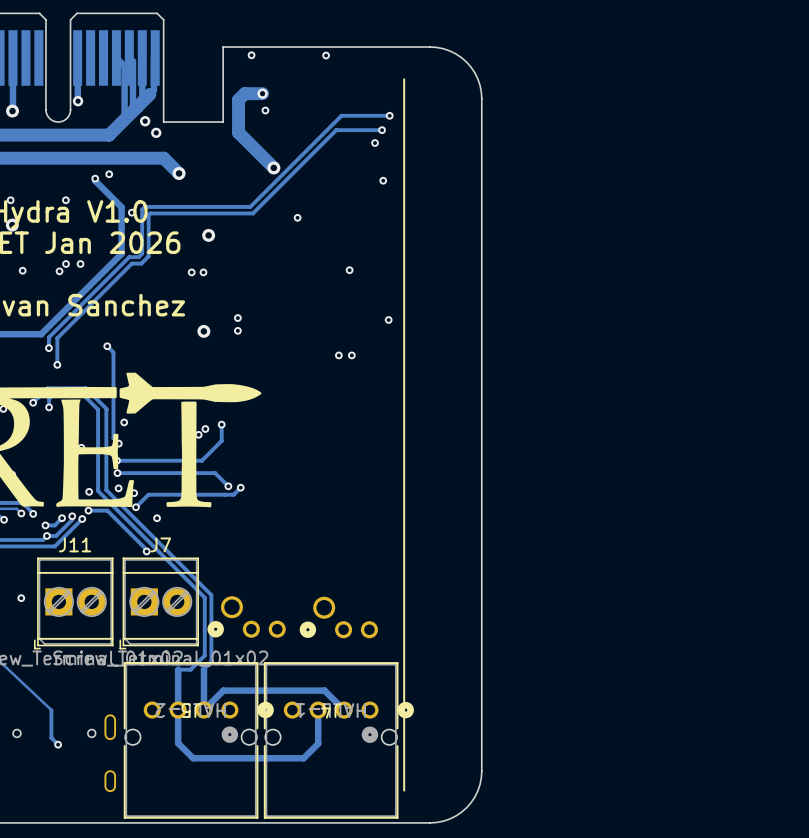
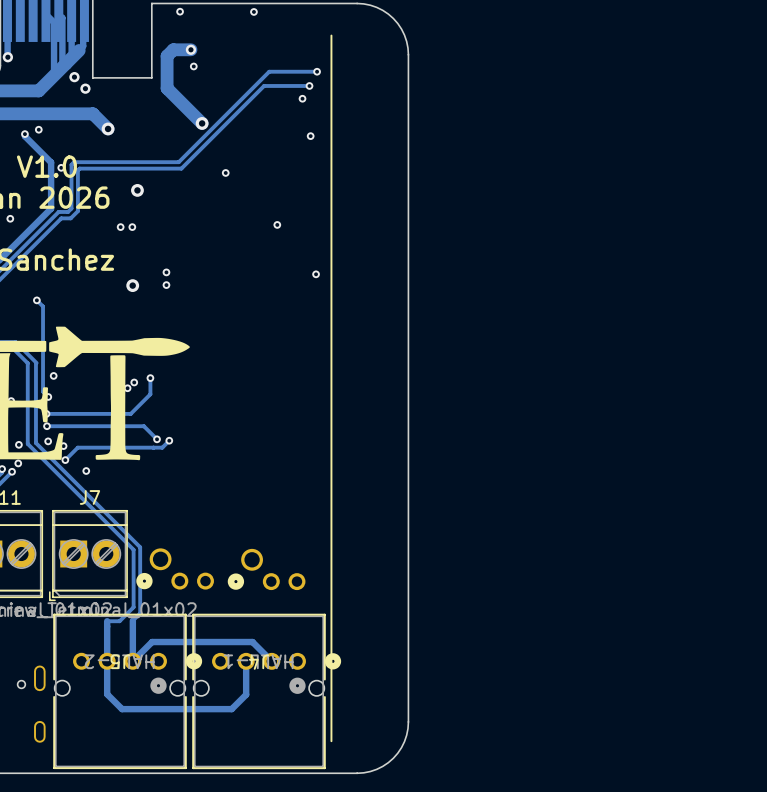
via: (338, 355) -> none
via: (351, 355) -> none
track: (88, 510) (107, 510) (146, 551) -> none
via: (146, 551) -> none

